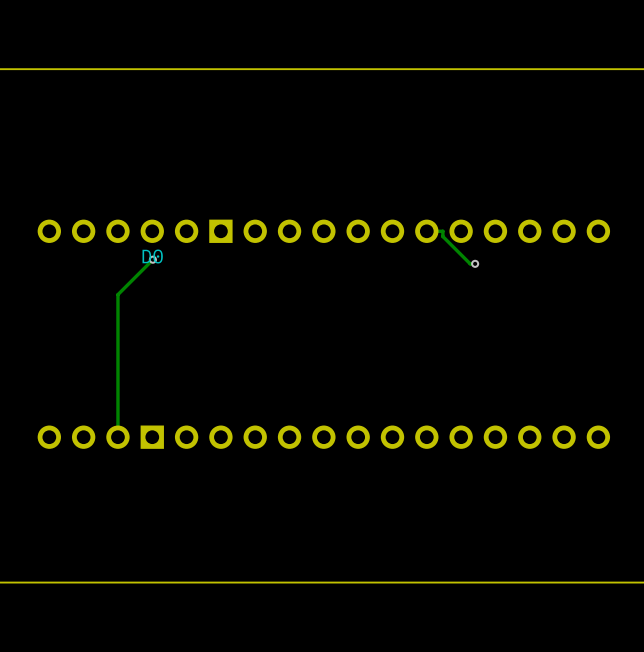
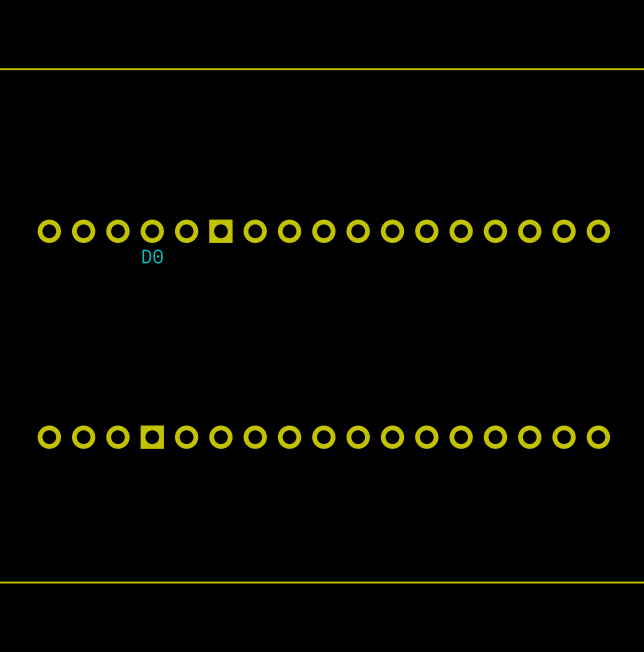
track: (426, 231) (442, 231) (442, 236) (470, 263) (475, 263) -> none
track: (152, 259) (117, 294) (117, 437) -> none
via: (152, 259) -> none
via: (475, 263) -> none

